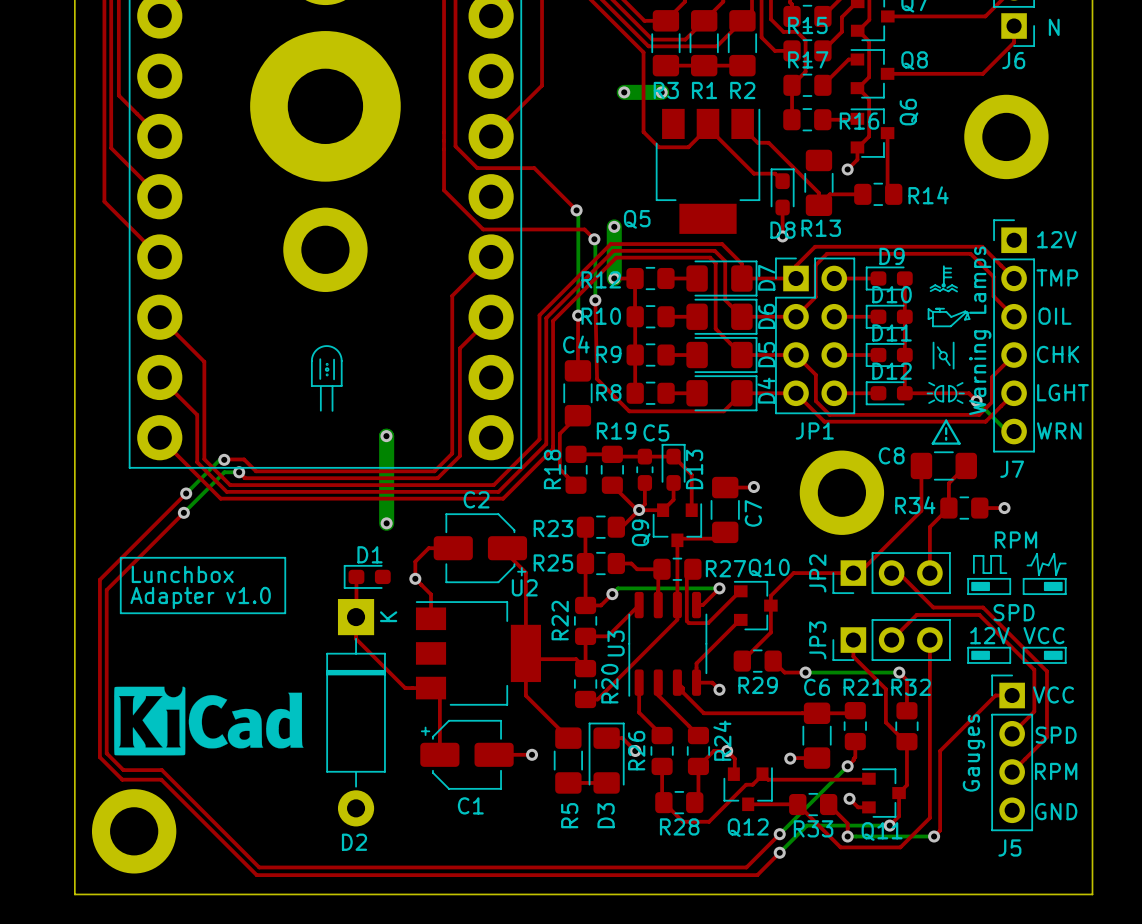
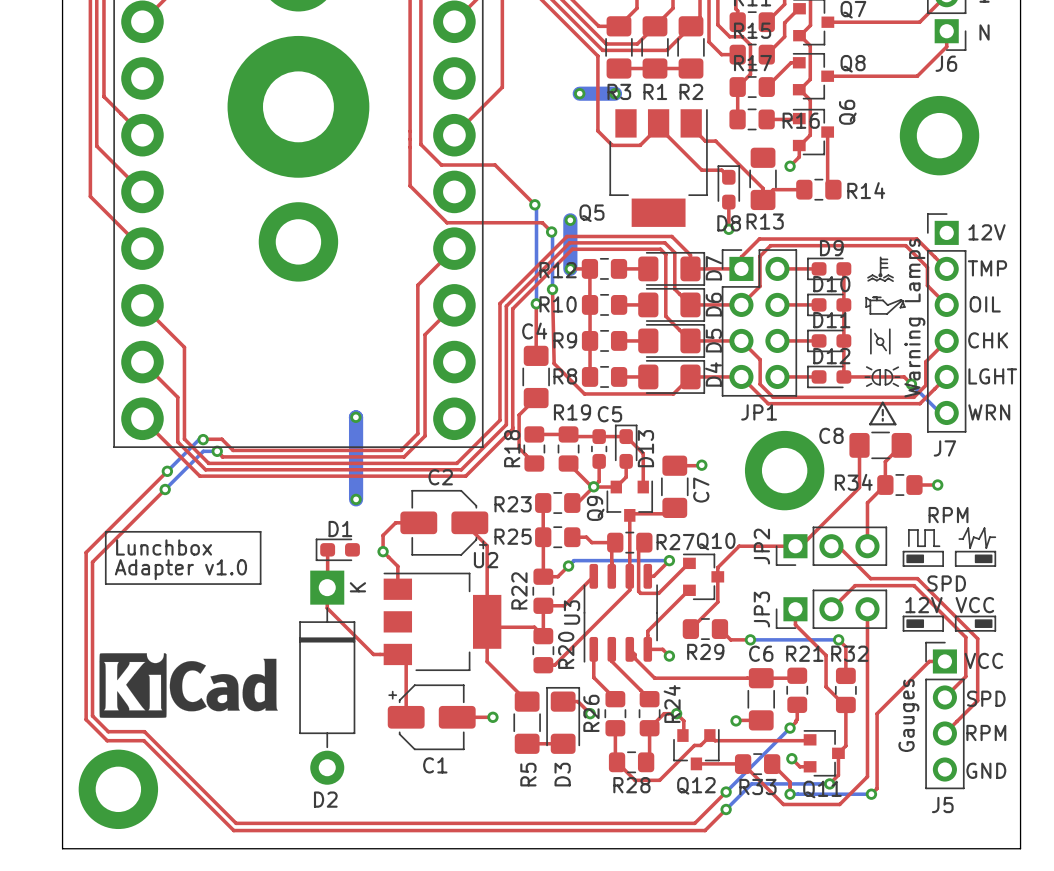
line: (320, 359) (320, 378) -> none
line: (334, 359) (334, 379) -> none
drawing: [324, 362, 330, 377] -> none
line: (341, 385) (341, 360) (339, 353) (330, 346) (319, 348) (314, 351) (311, 359) (311, 386) (341, 386) -> none
line: (332, 386) (332, 410) -> none
line: (320, 387) (320, 410) -> none

